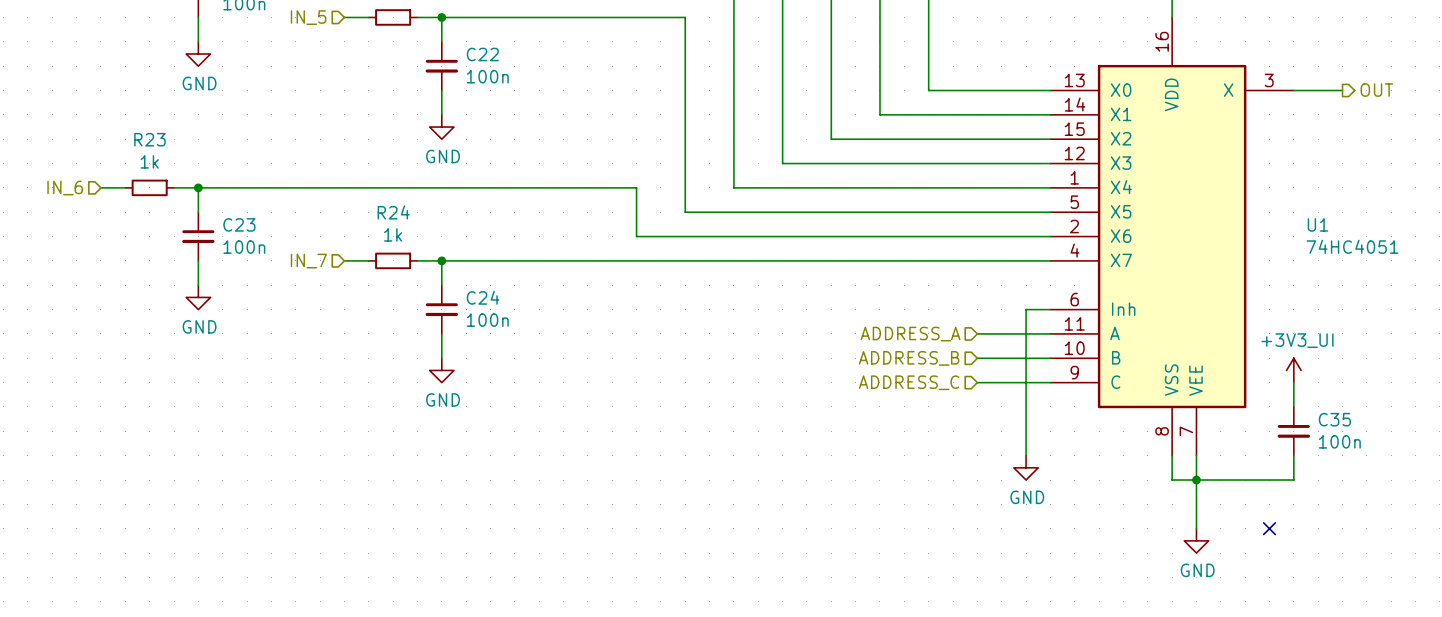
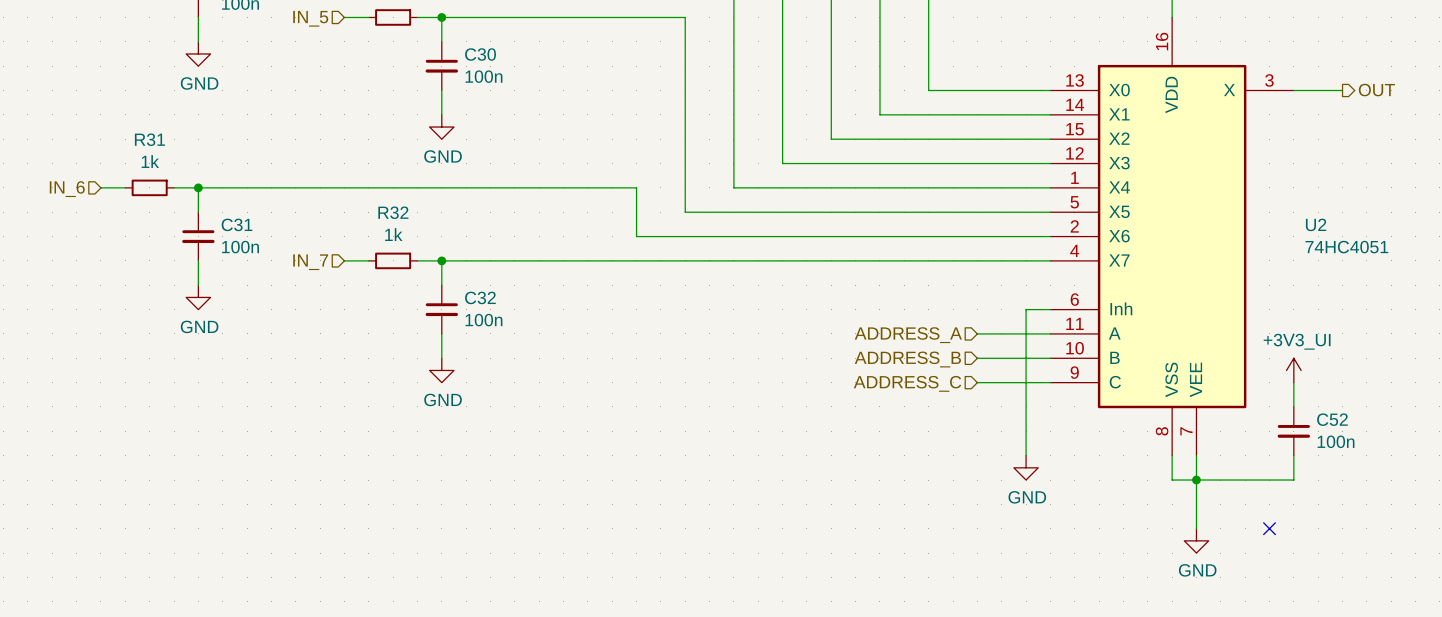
C22 name: C22 (482, 54) -> C30 (480, 54)
R23 name: R23 (149, 139) -> R31 (149, 139)
R24 name: R24 (393, 212) -> R32 (393, 212)
C23 name: C23 (239, 224) -> C31 (237, 224)
U1 name: U1 (1317, 224) -> U2 (1316, 224)
C24 name: C24 (483, 297) -> C32 (480, 297)
C35 name: C35 (1334, 419) -> C52 (1332, 419)

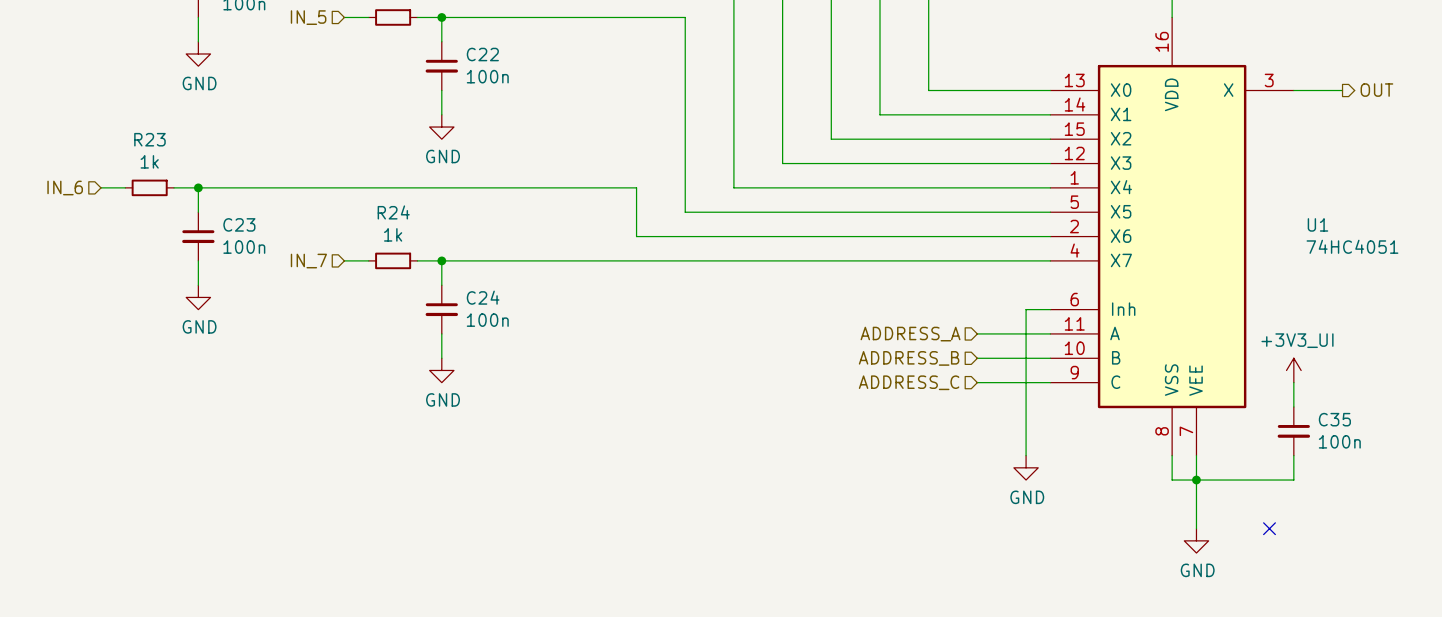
C30 name: C30 (480, 54) -> C22 (482, 54)
R31 name: R31 (149, 139) -> R23 (149, 139)
R32 name: R32 (393, 212) -> R24 (393, 212)
C31 name: C31 (237, 224) -> C23 (239, 224)
U2 name: U2 (1316, 224) -> U1 (1317, 224)
C32 name: C32 (480, 297) -> C24 (483, 297)
C52 name: C52 (1332, 419) -> C35 (1334, 419)

